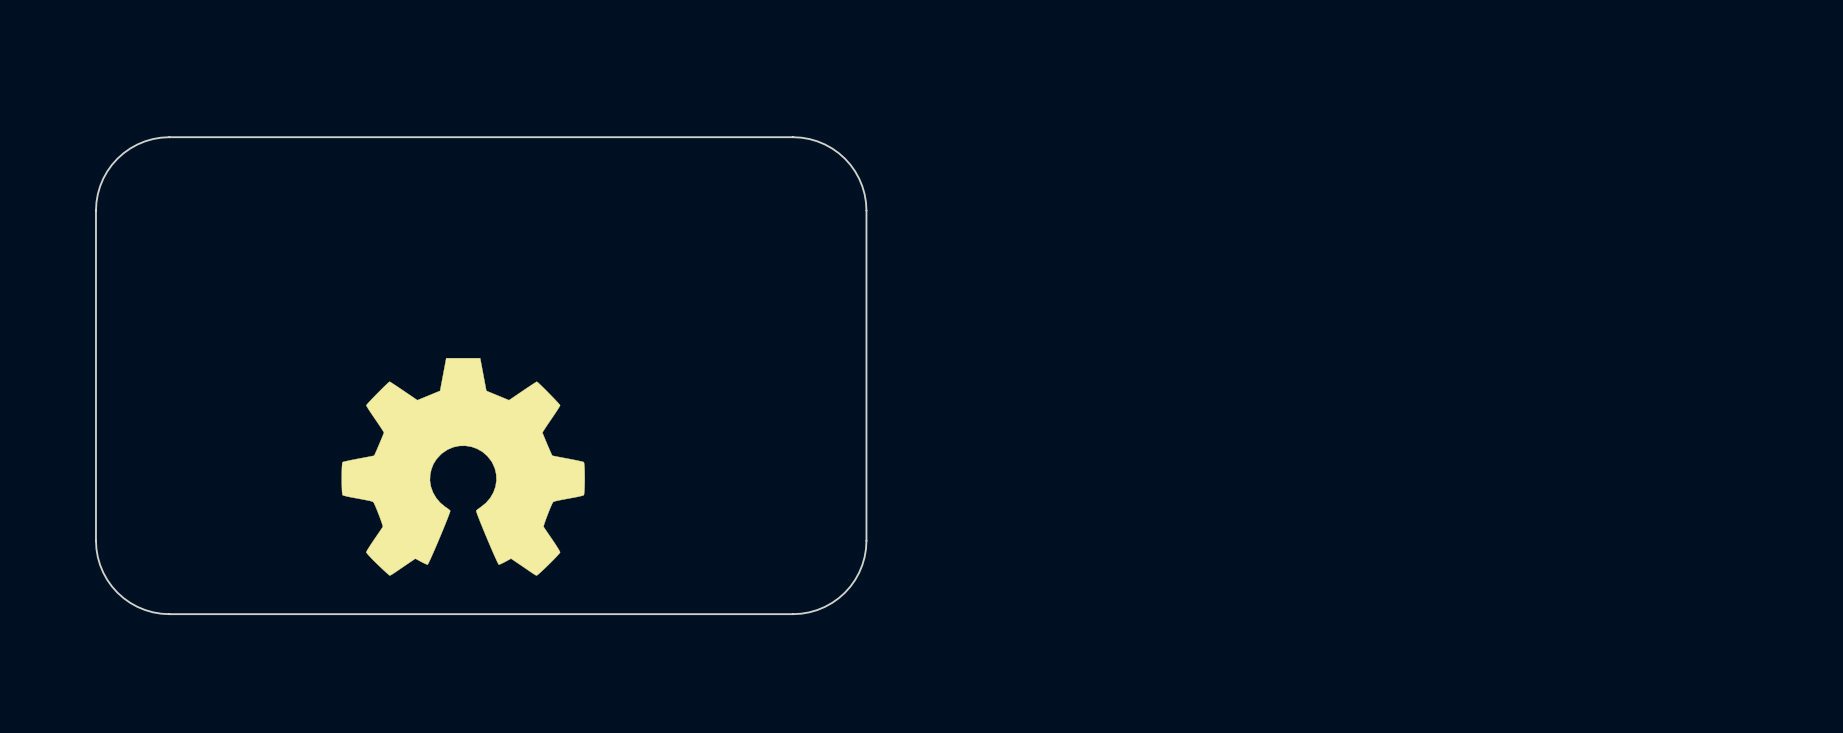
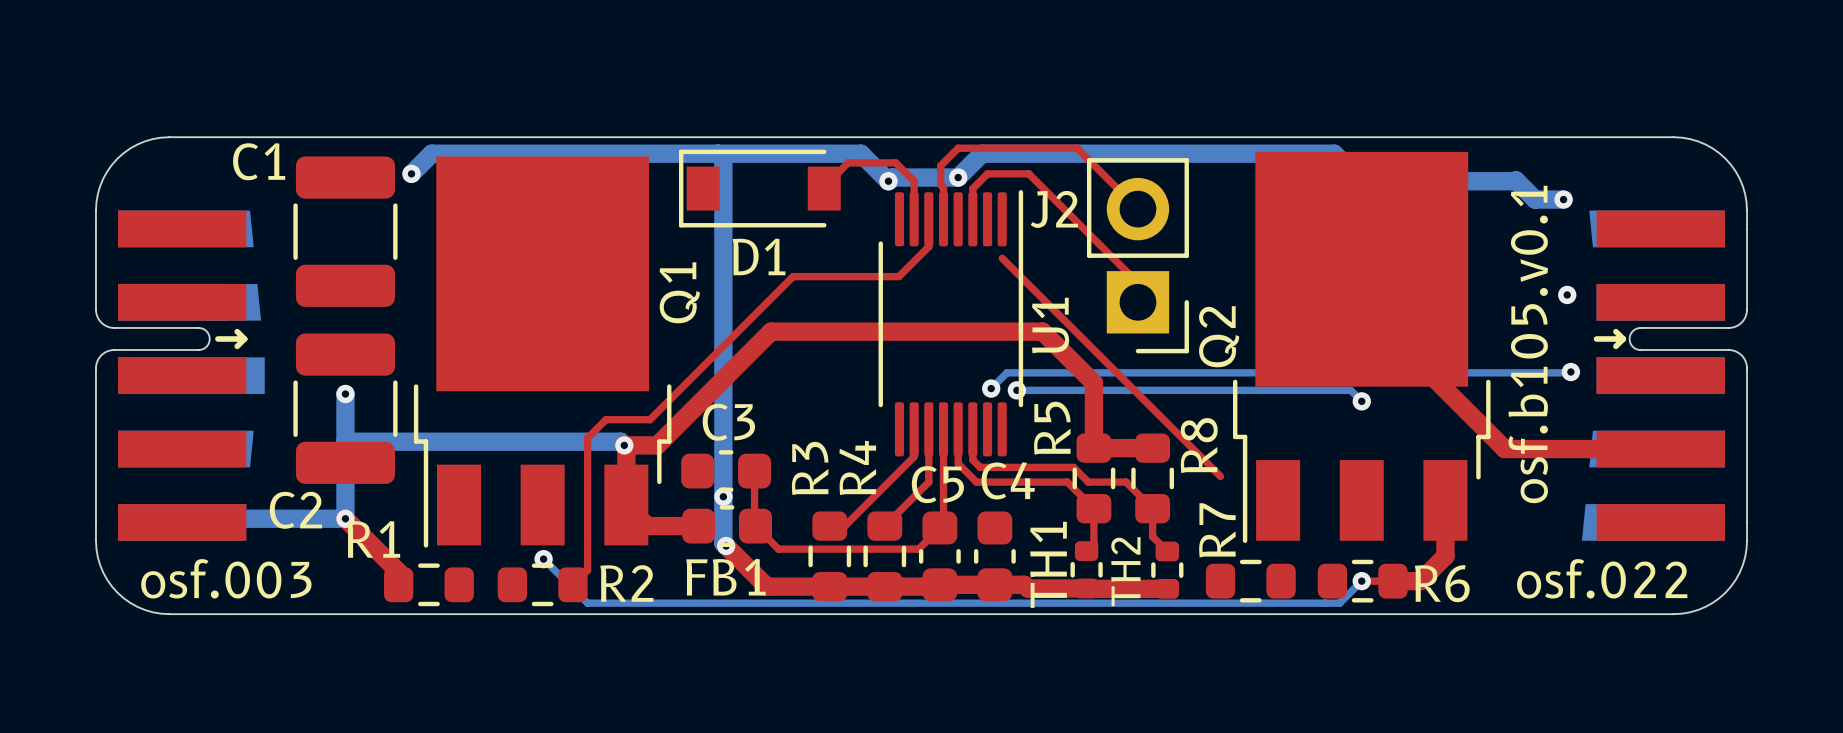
board edge: (793, 137) (817, 141) (832, 148) (844, 158) (859, 178) (864, 194) (866, 210) (866, 540) (864, 557) (855, 579) (838, 598) (817, 610) (793, 614) -> (793, 137) (1681, 137) (1697, 141) (1712, 148) (1731, 164) (1739, 178) (1745, 194) (1747, 228)
bottom track: none -> (717, 153) (723, 159) (723, 543) (726, 546)
bottom track: none -> (411, 173) (431, 153) (860, 153) (888, 181) (892, 177) (958, 177) (982, 153) (1334, 153) (1358, 177) (1427, 177) (1431, 181) (1515, 180) (1535, 199) (1563, 199)
via: none -> (411, 173)
via: none -> (958, 177)
via: none -> (888, 181)
D1: none -> (759, 188)
top track: none -> (824, 188) (848, 162) (895, 162) (914, 181) (914, 219)
via: none -> (1563, 199)
top track: none -> (1137, 209) (1077, 148) (958, 148) (940, 165) (940, 184) (943, 187) (943, 219)
top track: none -> (928, 219) (928, 246) (898, 276) (793, 276) (649, 419) (605, 419) (587, 438) (587, 570) (572, 584)
top track: none -> (972, 219) (972, 188) (987, 173) (1028, 173) (1137, 282)
board edge: (95, 228) (95, 522) -> none
C1: none -> (345, 231)
J2: none -> (1137, 255)
top track: none -> (1002, 258) (1220, 476)
via: none -> (1567, 294)
top track: none -> (1361, 305) (1504, 449) (1660, 449)
U1: none -> (950, 323)
text: none -> osf.b105.v0.1 (1528, 344)
Q2: none -> (1361, 347)
Q1: none -> (542, 352)
drawing: [341, 358, 585, 576] -> none
bottom track: none -> (1570, 372) (1006, 372) (991, 388)
via: none -> (1570, 372)
part: none -> (179, 375)
part: none -> (1664, 375)
via: none -> (991, 388)
bottom track: none -> (1016, 390) (1350, 390) (1361, 401)
via: none -> (1016, 390)
bottom track: none -> (345, 394) (345, 518) (184, 518) (180, 522)
via: none -> (345, 394)
via: none -> (1361, 401)
C2: none -> (345, 408)
top track: none -> (914, 429) (914, 456) (844, 526) (829, 526)
top track: none -> (928, 429) (928, 482) (884, 526)
top track: none -> (943, 429) (943, 524) (918, 549) (778, 549) (754, 525) (754, 471)
top track: none -> (958, 429) (958, 463) (976, 482) (1067, 482) (1093, 508) (1093, 543) (1086, 551)
top track: none -> (972, 429) (972, 460) (980, 467) (1073, 467) (1088, 482) (1126, 482) (1152, 508) (1152, 536) (1167, 551)
bottom track: none -> (345, 441) (620, 441) (624, 445)
via: none -> (624, 445)
top track: none -> (1152, 448) (1093, 448) (1093, 383) (1042, 331) (771, 331) (657, 445) (624, 445) (626, 447) (626, 505) (647, 526) (698, 526)
C3: none -> (726, 471)
R5: none -> (1093, 478)
R8: none -> (1152, 478)
via: none -> (723, 496)
top track: none -> (1445, 500) (1445, 556) (1420, 581) (1361, 581)
top track: none -> (345, 518) (398, 571) (398, 584)
via: none -> (345, 518)
board edge: none -> (1747, 522) (1745, 557) (1739, 572) (1731, 586) (1712, 602) (1697, 610) (1681, 613) (793, 614)
FB1: none -> (727, 526)
top track: none -> (726, 546) (766, 586) (1024, 584) (1027, 588) (1086, 588)
via: none -> (726, 546)
R3: none -> (829, 556)
R4: none -> (884, 556)
C5: none -> (939, 556)
C4: none -> (994, 556)
bottom track: none -> (543, 559) (587, 603) (1339, 603) (1361, 581)
via: none -> (543, 559)
TH1: none -> (1086, 569)
TH2: none -> (1167, 570)
text: none -> osf.003 (226, 578)
text: none -> osf.022 (1602, 578)
R7: none -> (1250, 581)
via: none -> (1361, 581)
R6: none -> (1362, 581)
R1: none -> (428, 584)
R2: none -> (542, 584)
top track: none -> (1086, 588) (1167, 588)

